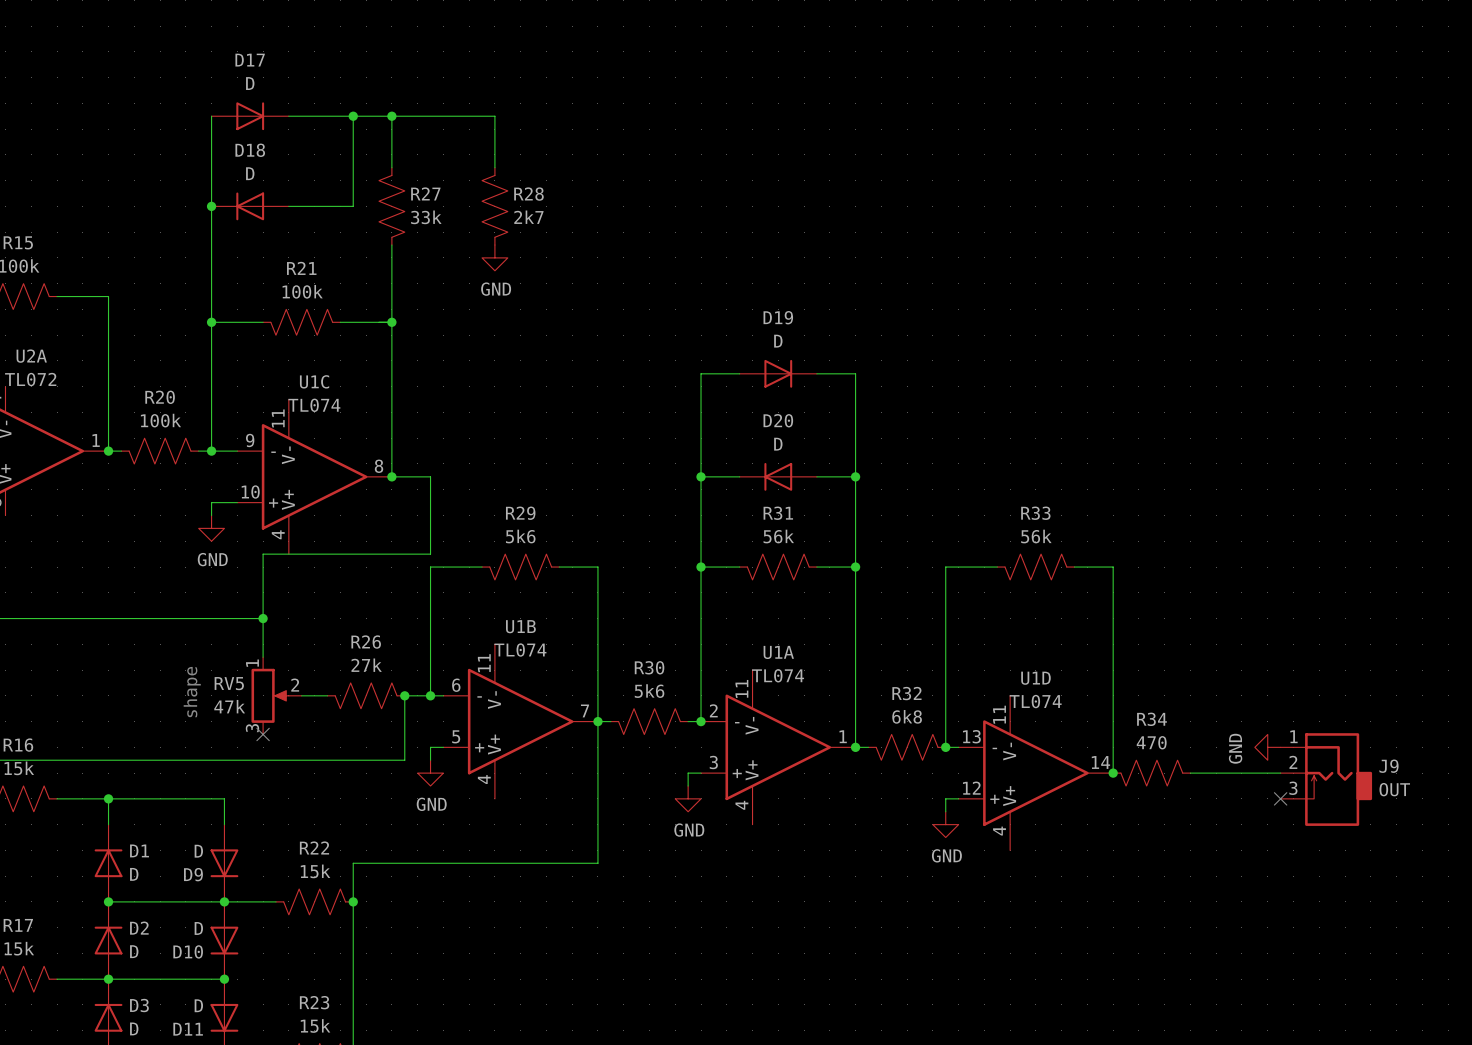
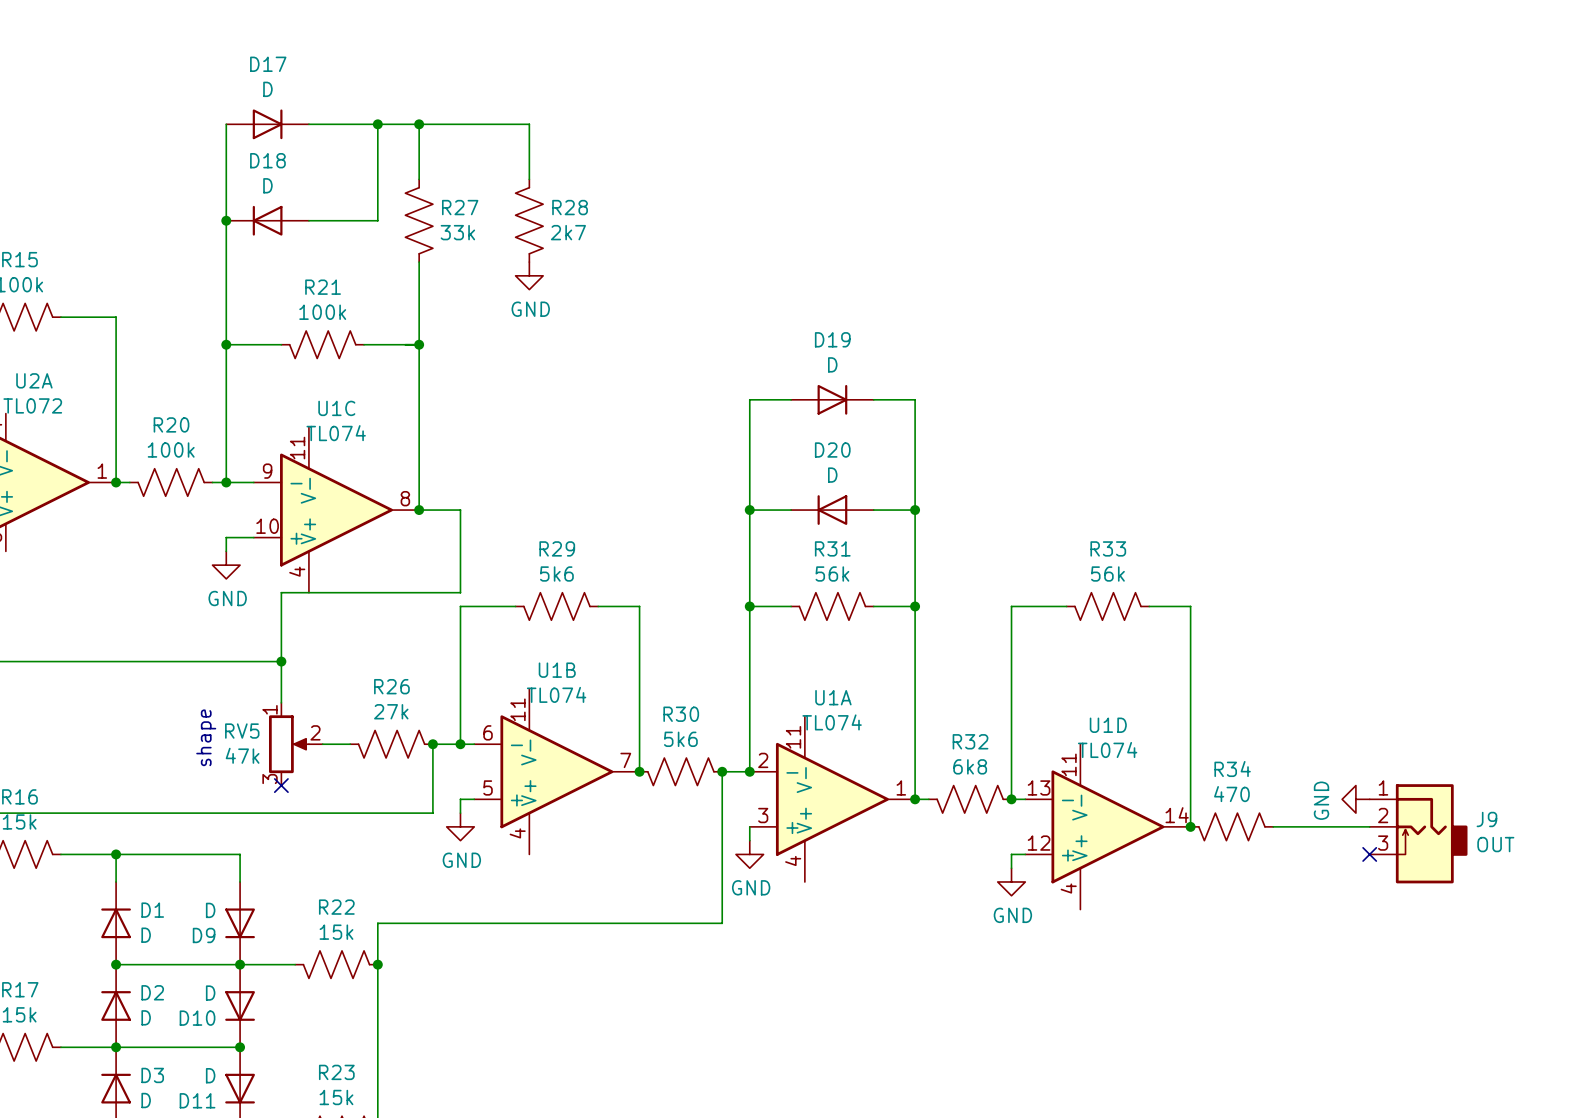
wire: (610, 721) (597, 721) (597, 863) -> (736, 771) (722, 771) (722, 923) (639, 923)
R30 position: (649, 721) -> (680, 771)
junction: none -> (722, 771)
wire: (701, 773) (688, 773) (688, 785) -> (749, 826) (749, 840)
power symbol position: GND (688, 798) -> GND (749, 854)

